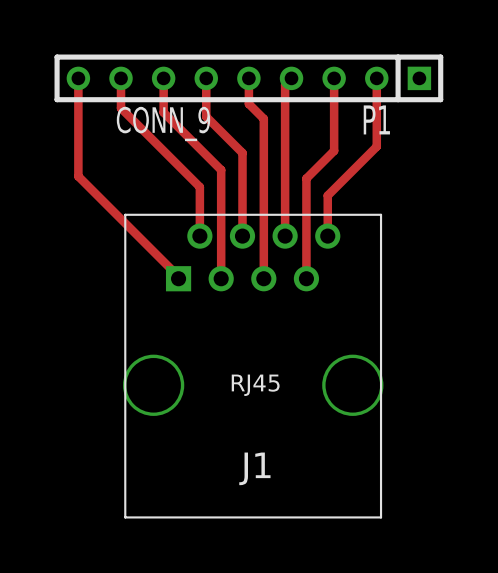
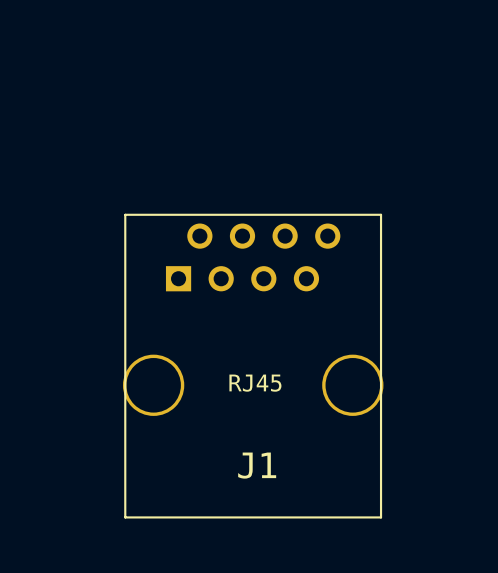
top track: (78, 78) (78, 176) (178, 278) -> none
top track: (121, 78) (121, 108) (199, 187) (199, 236) -> none
top track: (163, 78) (163, 112) (221, 170) (221, 278) -> none
top track: (206, 78) (206, 116) (242, 152) (242, 236) -> none
top track: (248, 78) (248, 103) (263, 118) (263, 278) -> none
P1: CONN_9 (248, 78) -> none
top track: (291, 78) (285, 84) (285, 236) -> none
top track: (334, 78) (334, 150) (306, 178) (306, 278) -> none
top track: (376, 78) (376, 146) (327, 195) (327, 236) -> none

